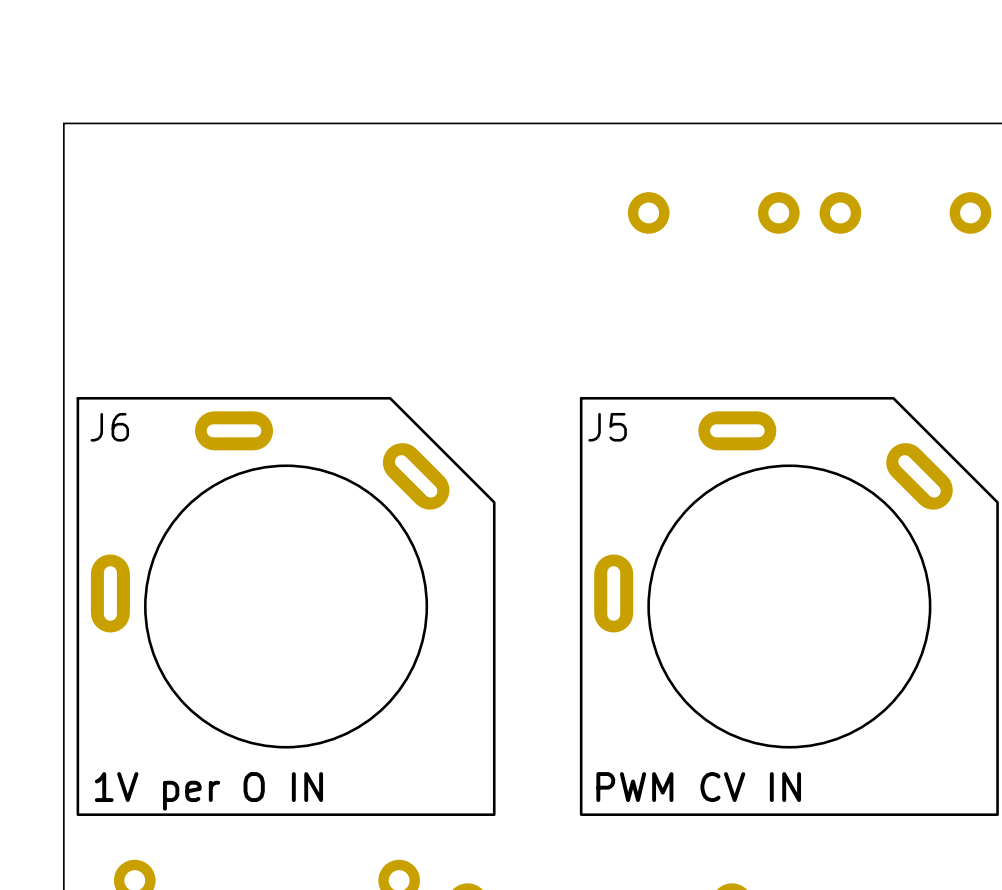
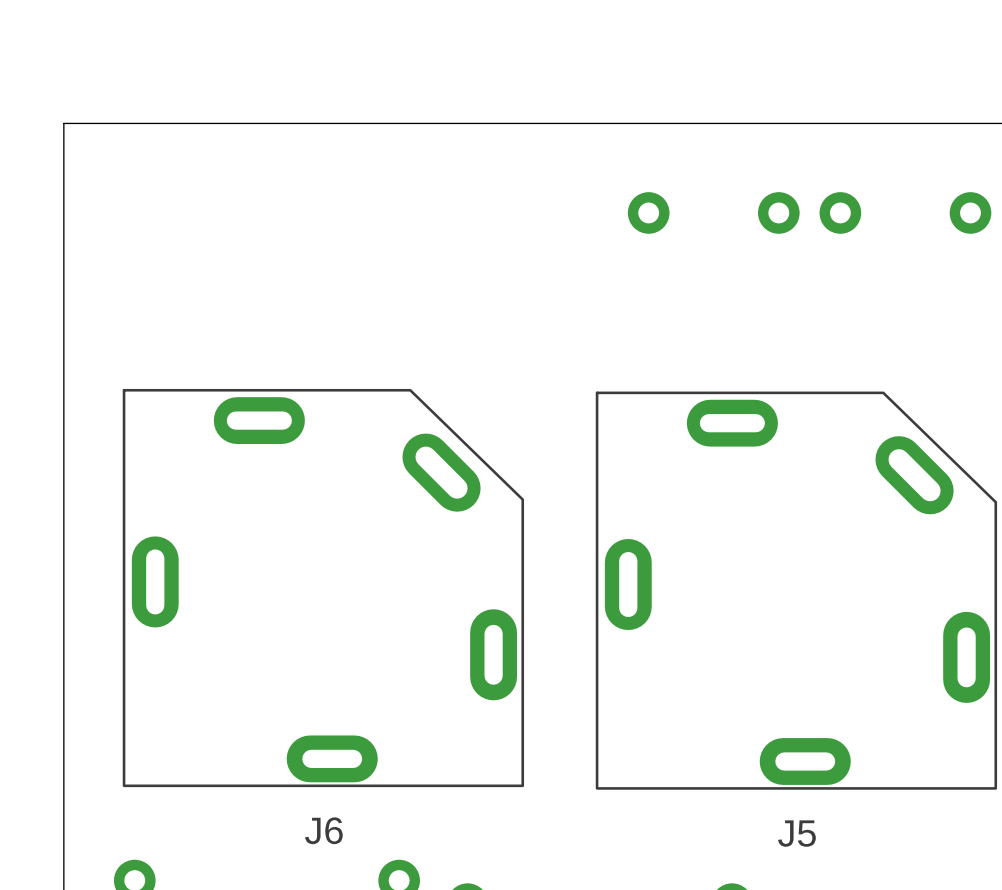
J6 footprint: [76, 397, 496, 816] -> [122, 388, 525, 788]
J5 footprint: [579, 397, 999, 816] -> [595, 391, 998, 790]
J6 name position: J6 (109, 427) -> J6 (323, 830)
J5 name position: J5 (607, 427) -> J5 (796, 833)
J5 value: PWM CV IN (698, 787) -> none
J6 value: 1V per O IN (208, 791) -> none

